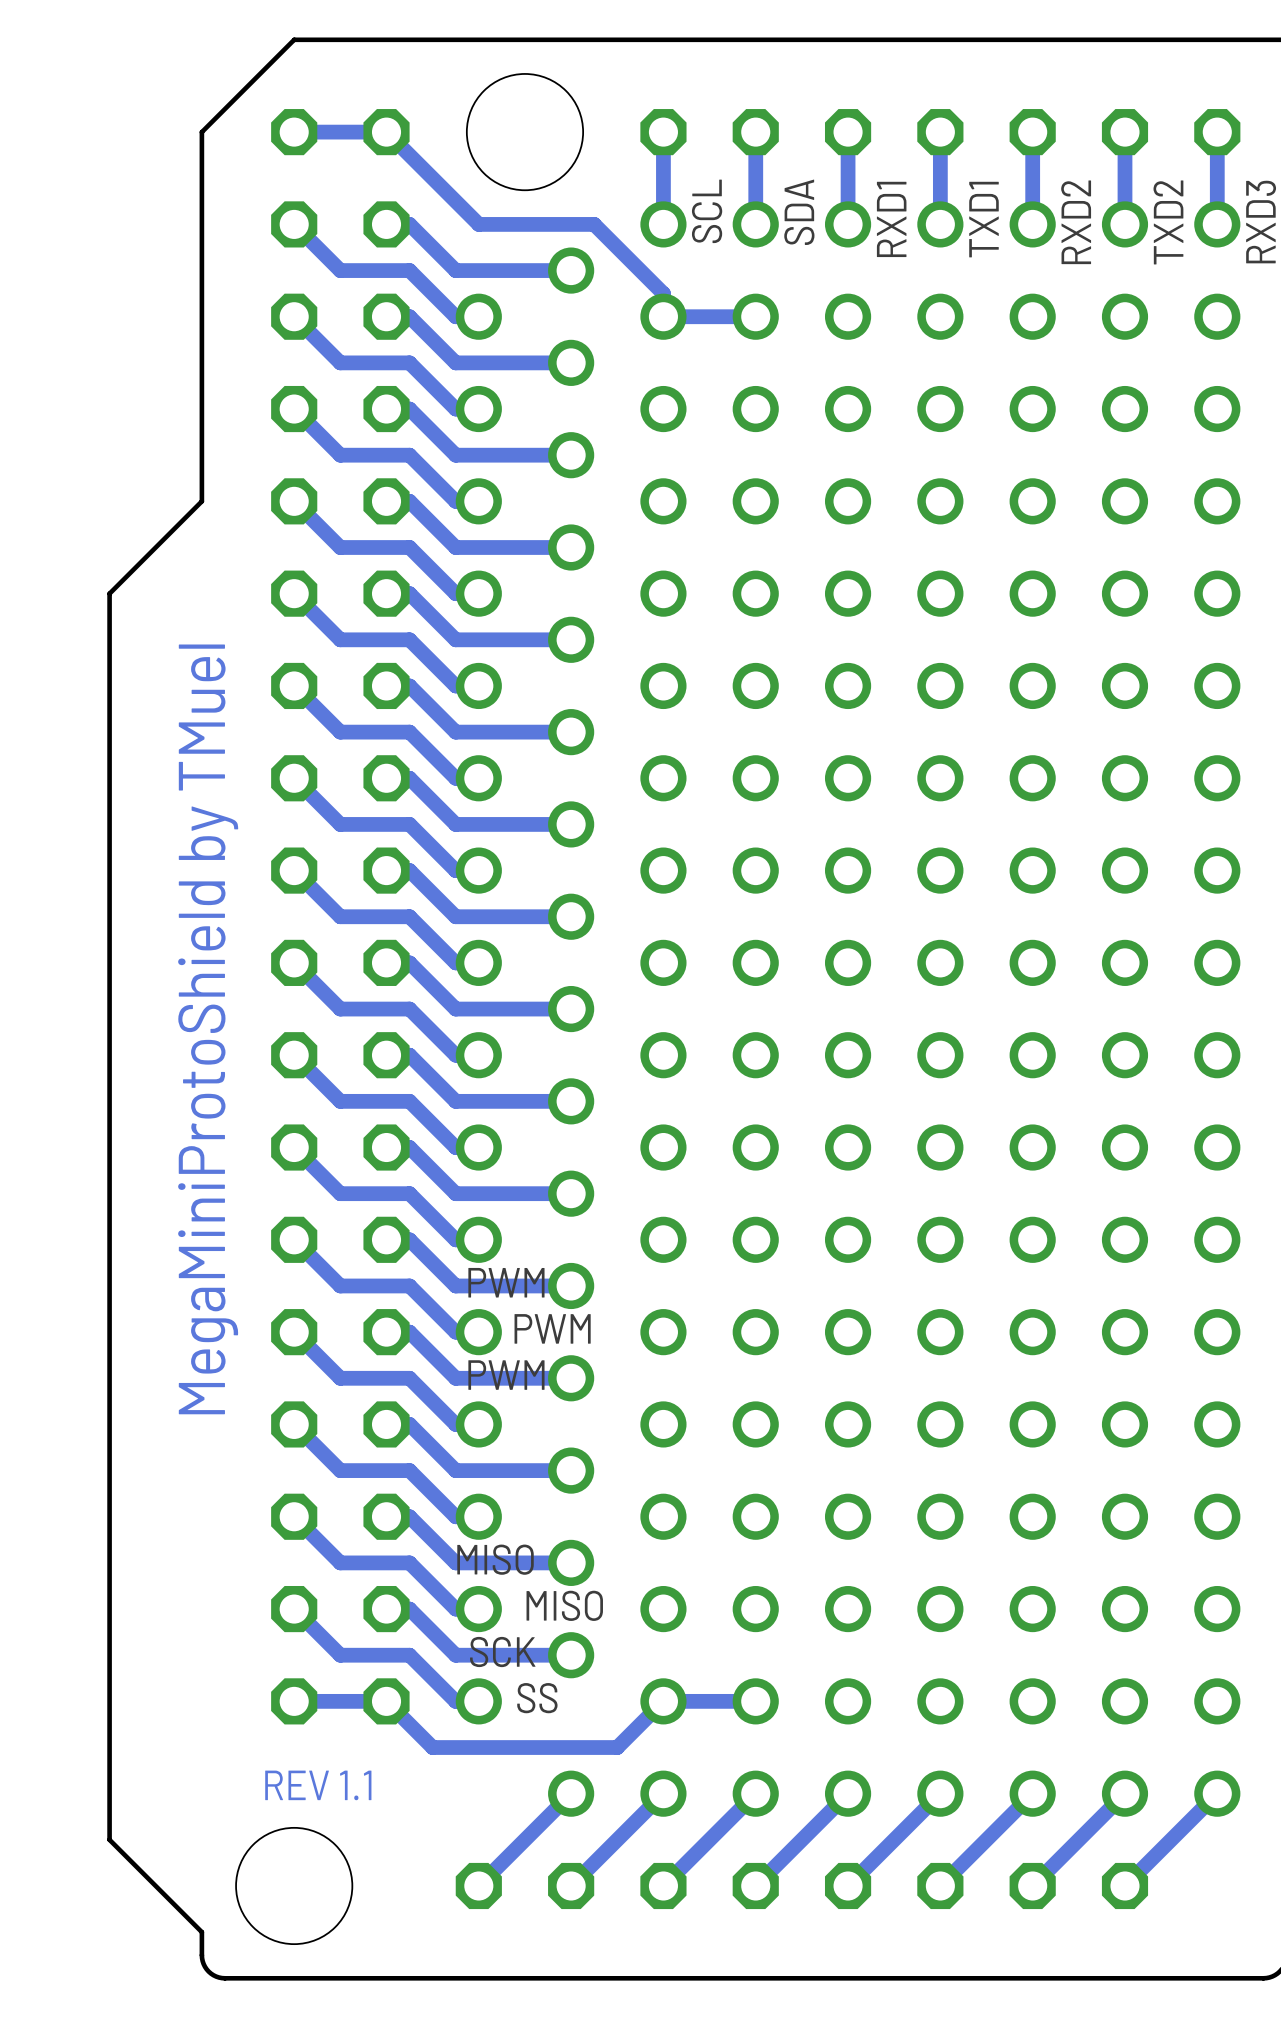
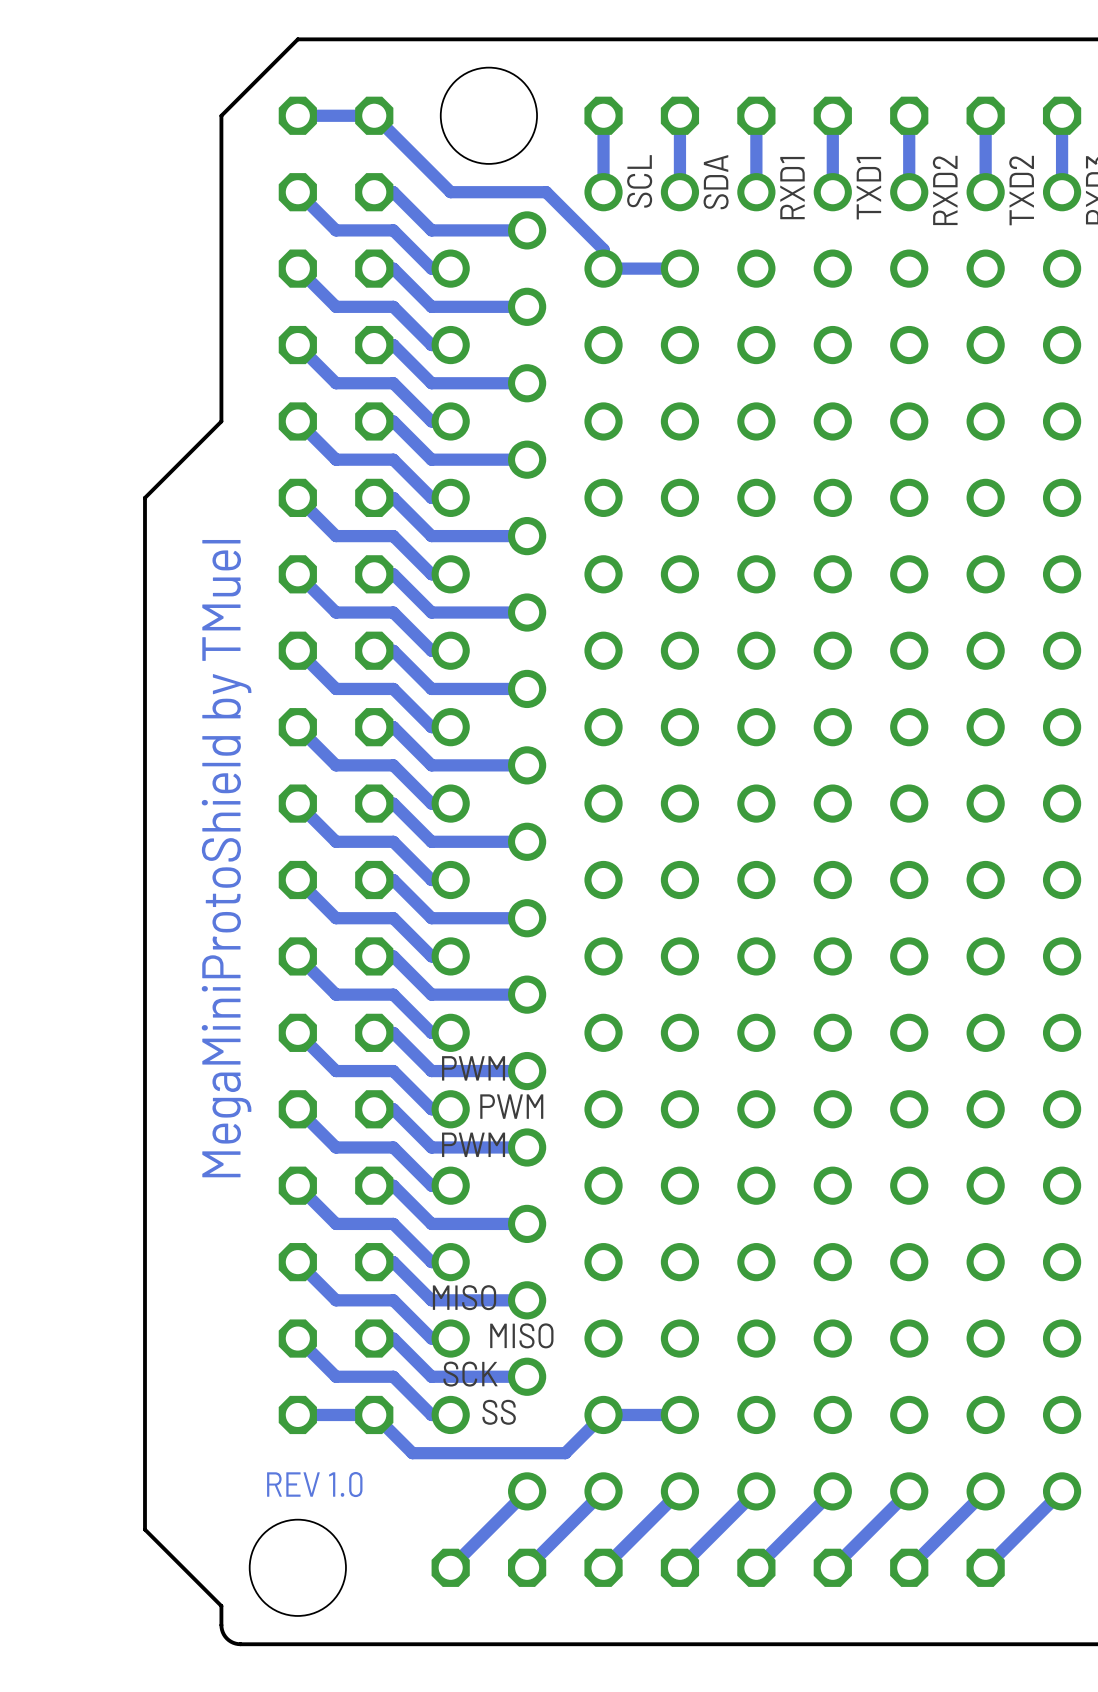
text: REV 1.1 (318, 1785) -> REV 1.0 (314, 1484)

